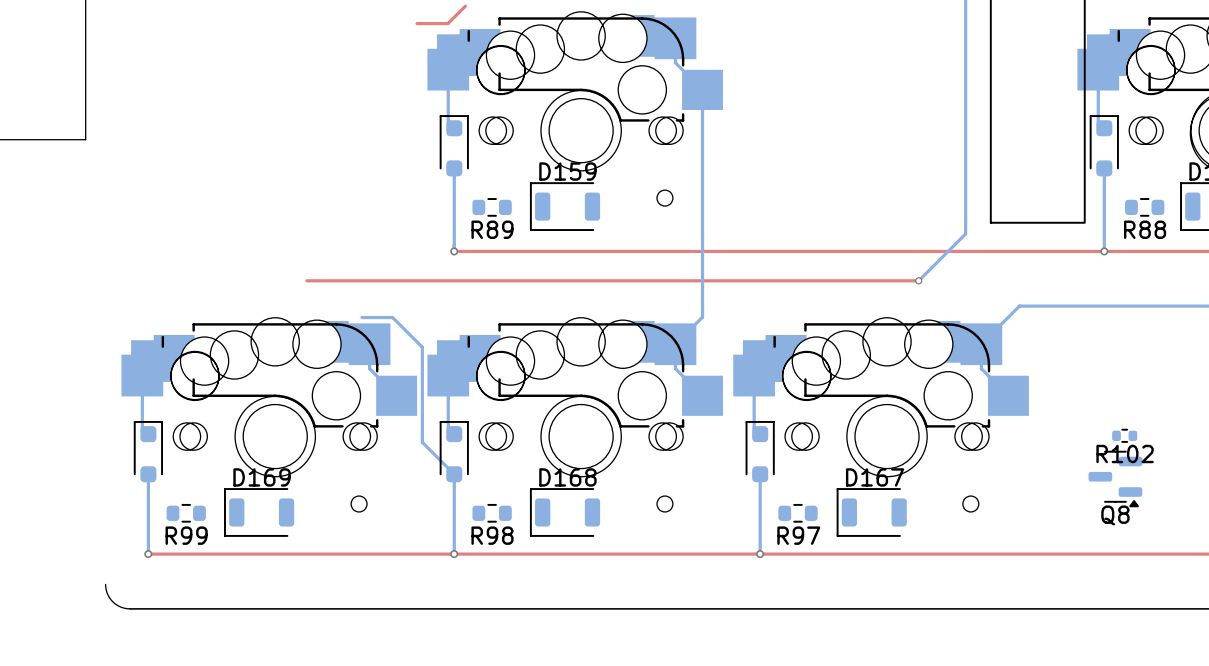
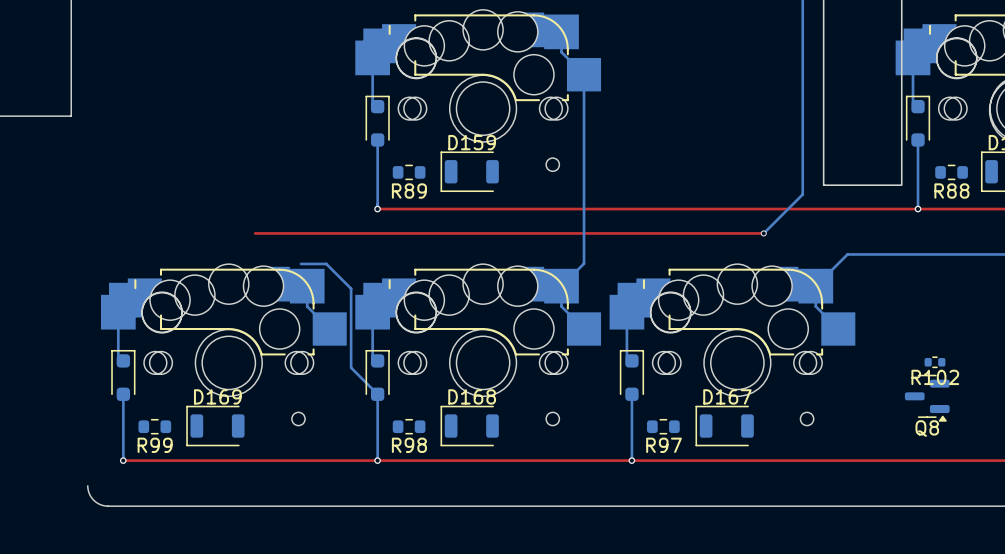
top track: (465, 6) (447, 23) (417, 23) -> none

